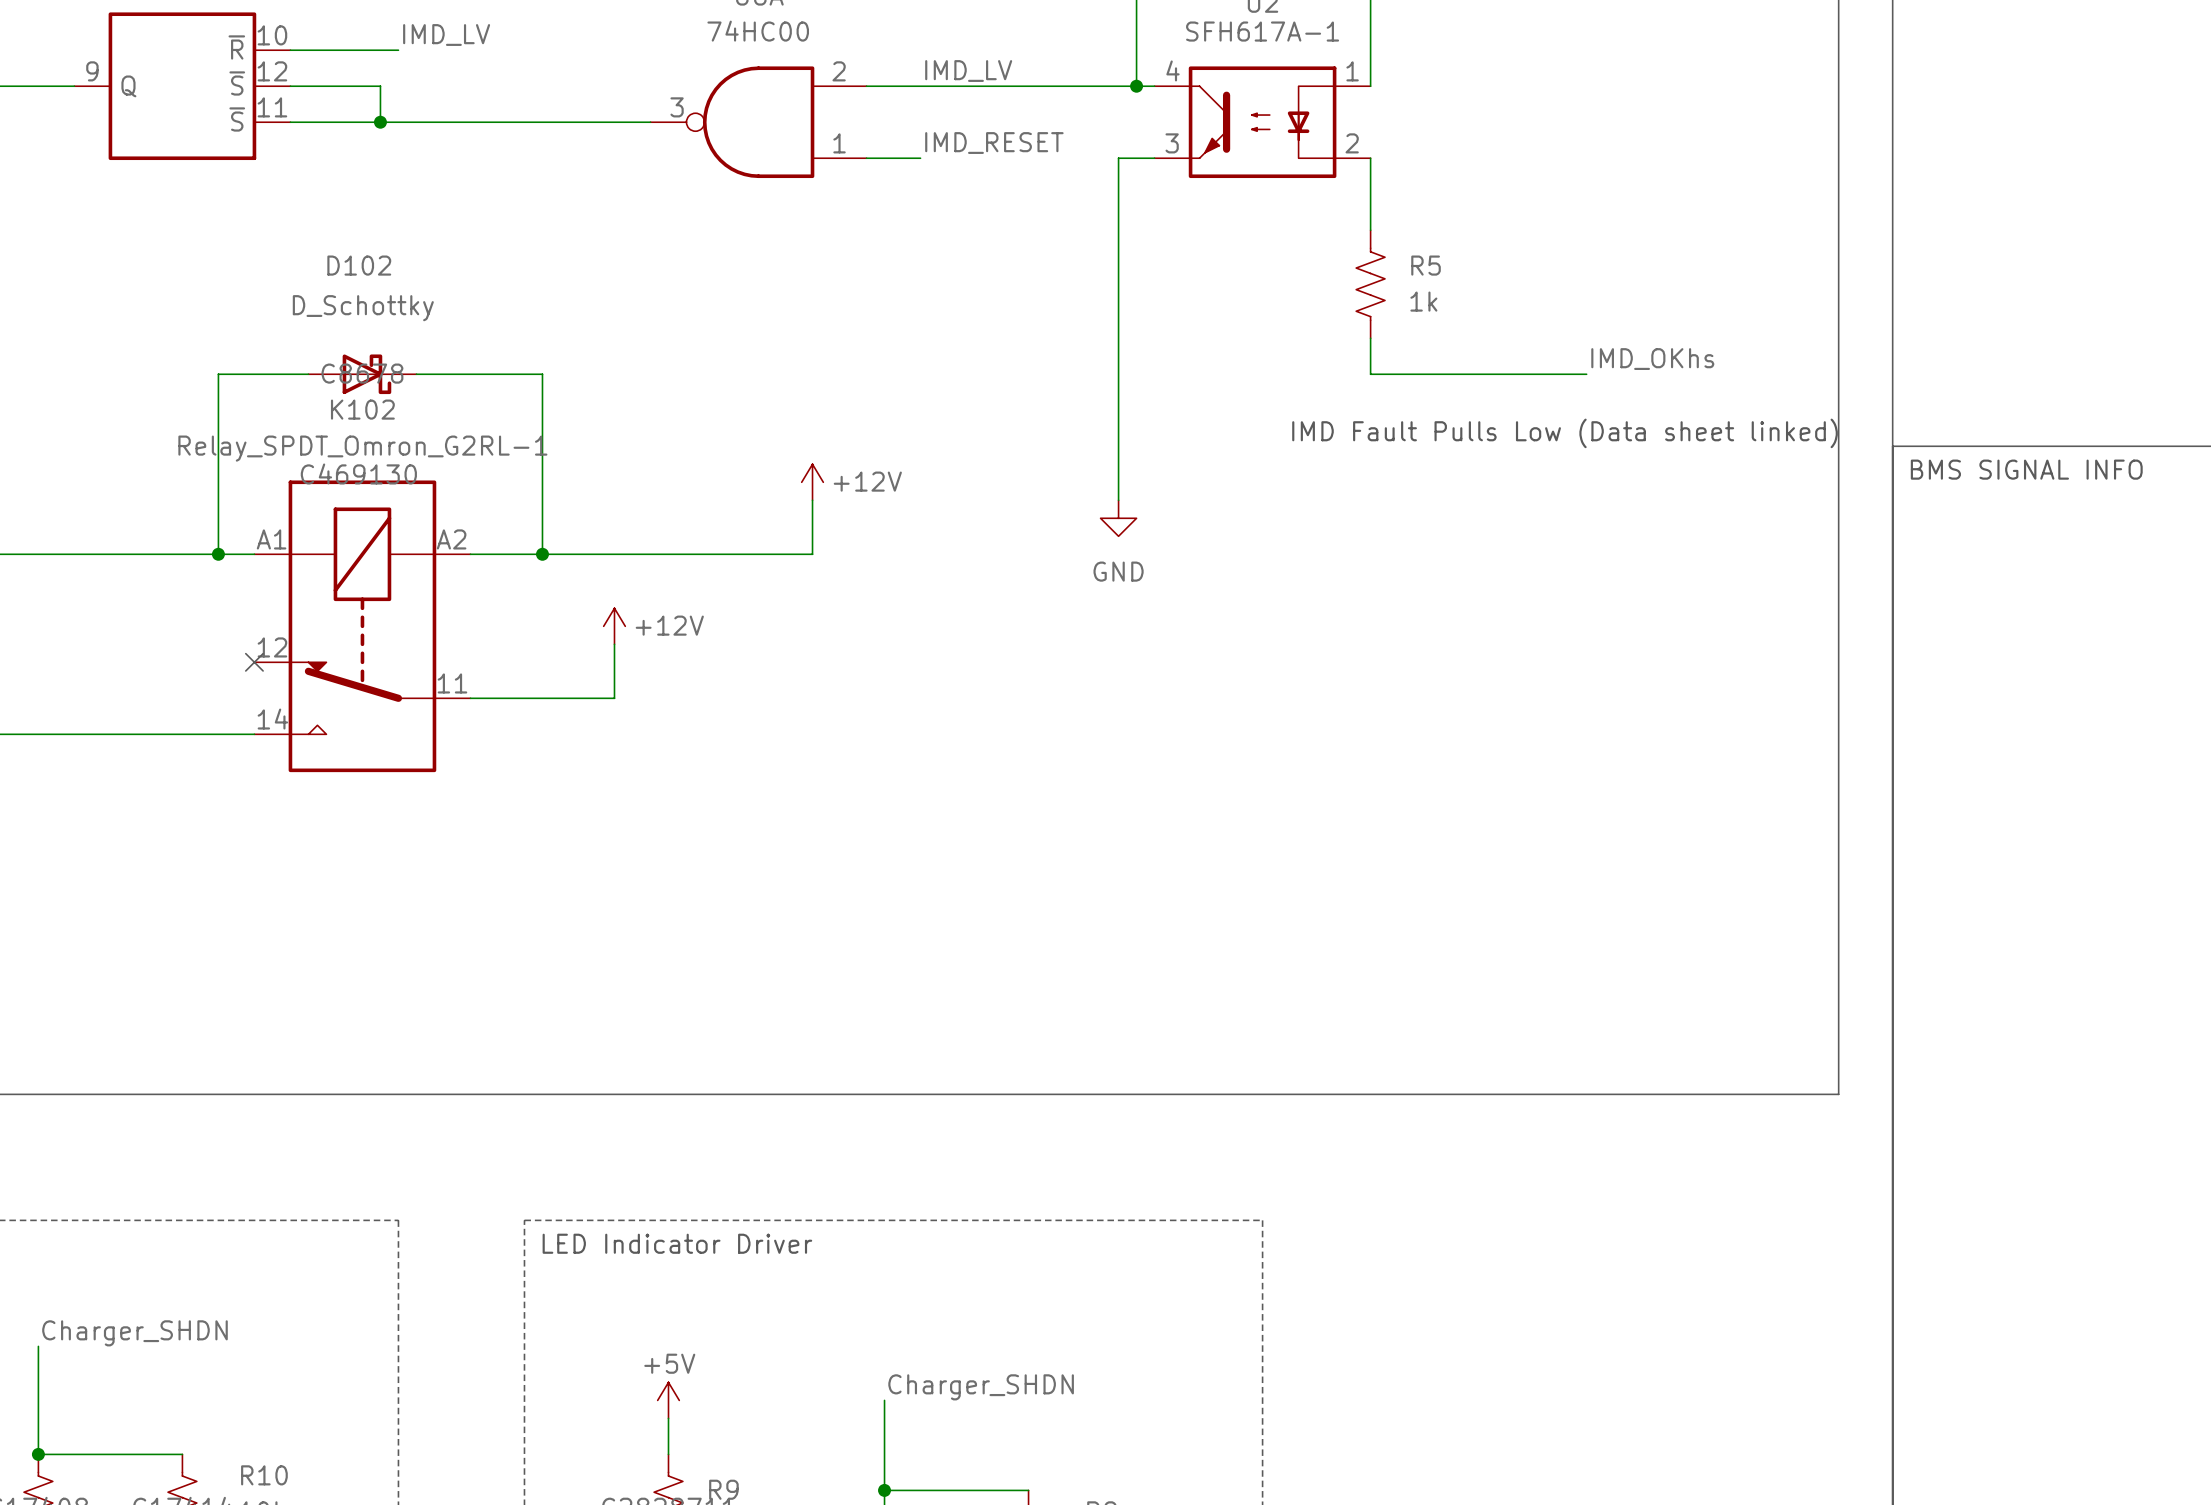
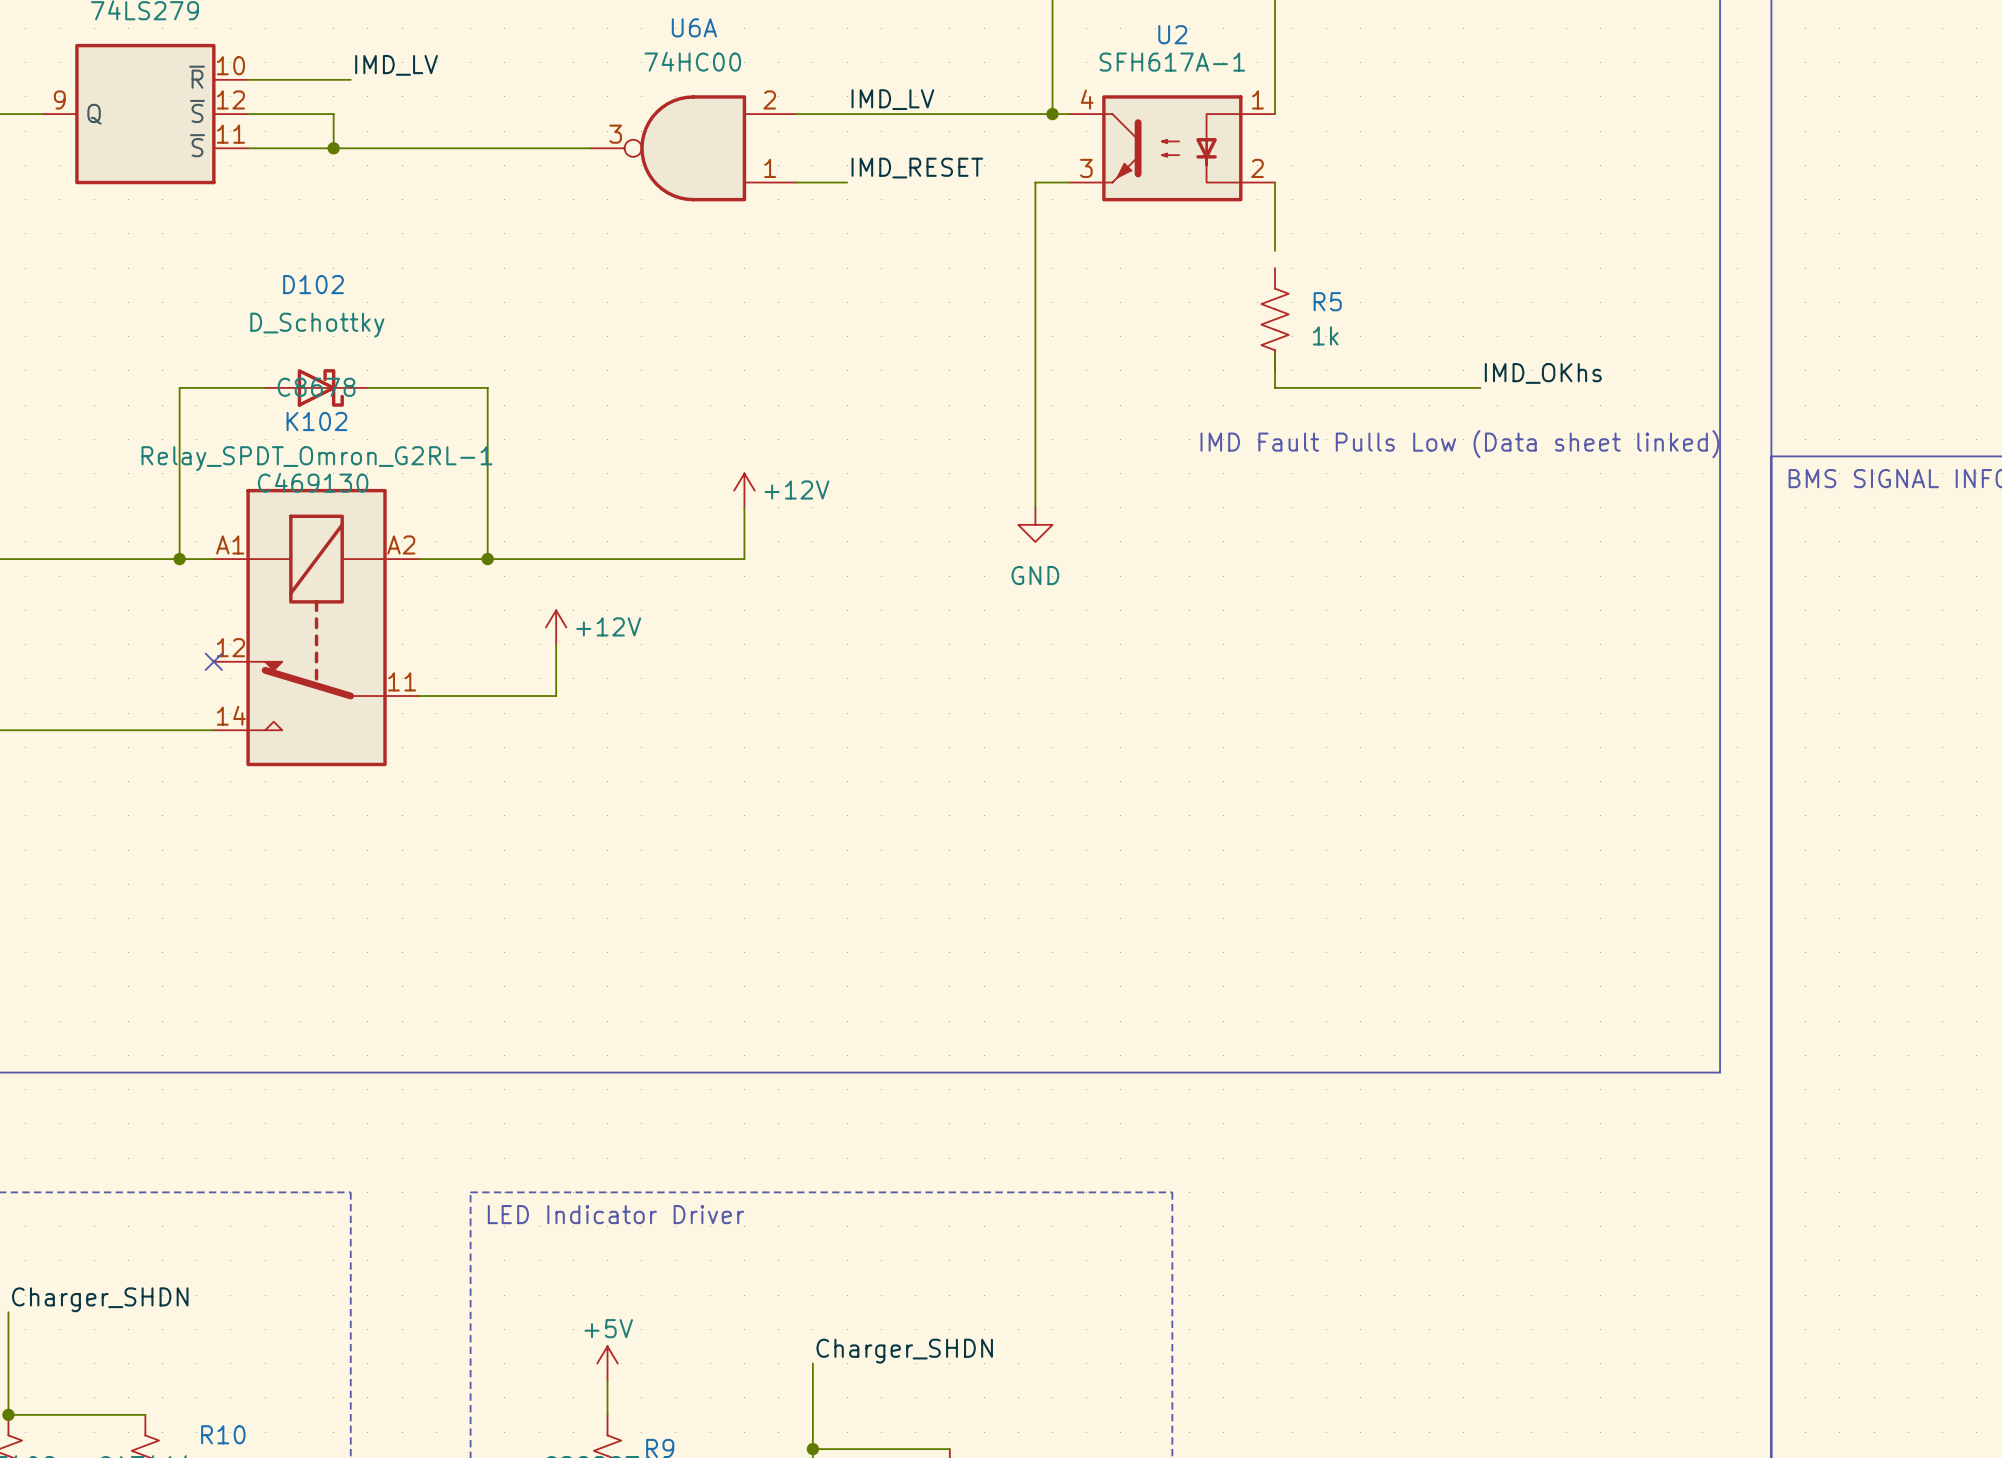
R5 position: (1370, 284) -> (1275, 319)

